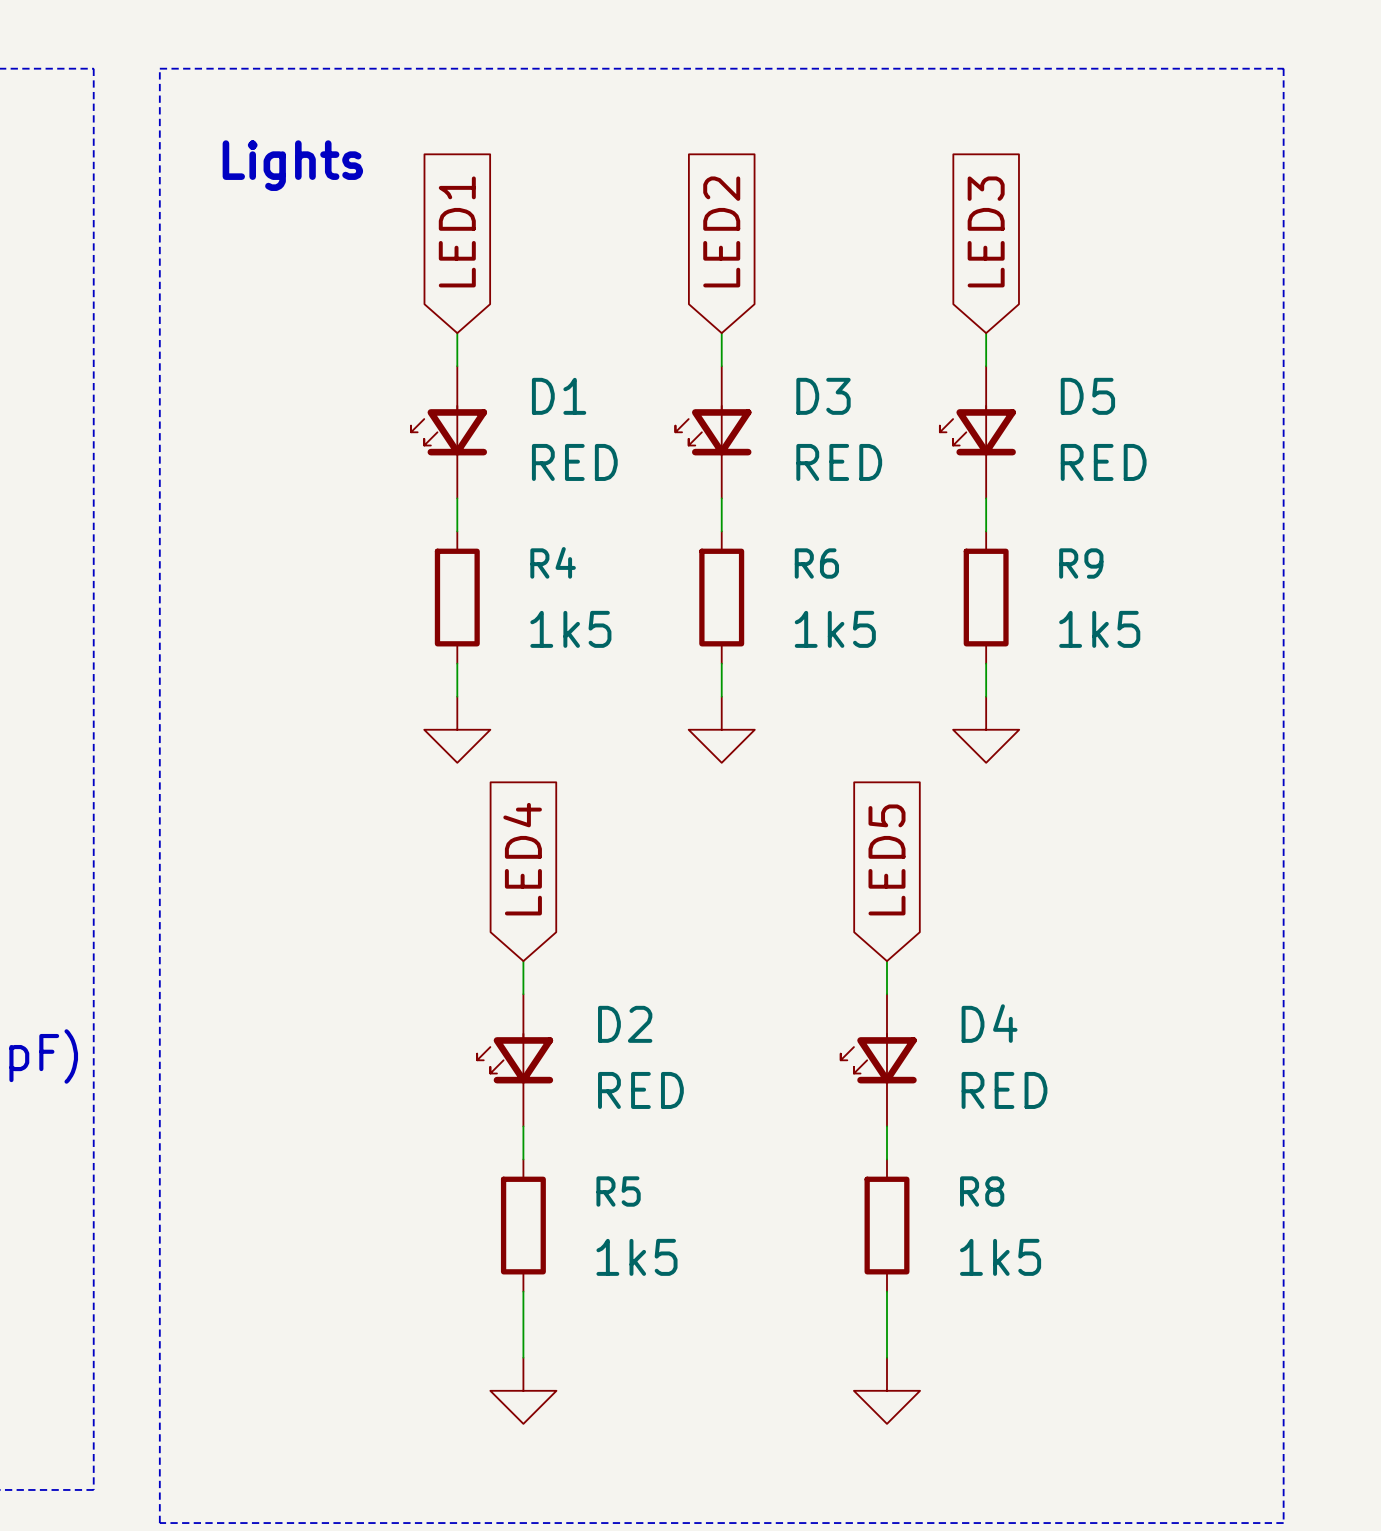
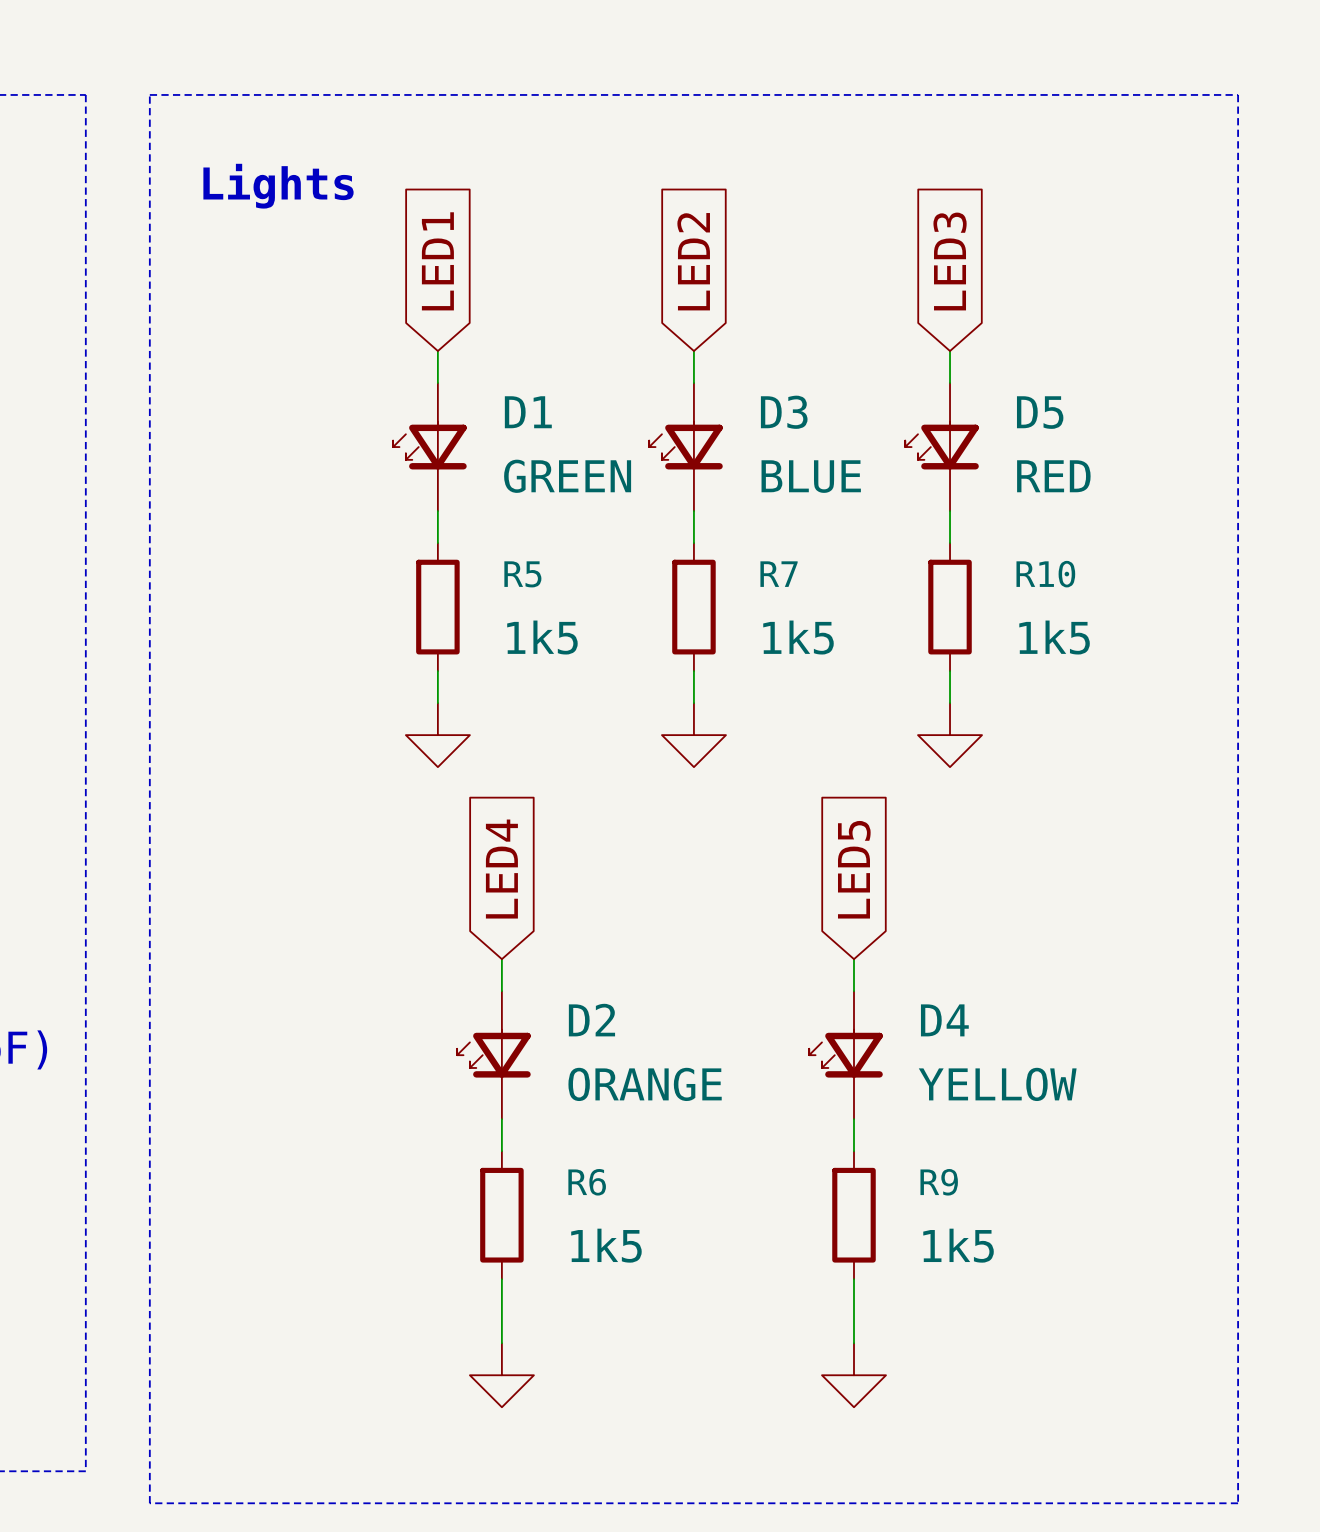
D1 value: RED (574, 462) -> GREEN (567, 476)
D3 value: RED (839, 462) -> BLUE (811, 476)
R4 name: R4 (553, 562) -> R5 (522, 574)
R6 name: R6 (816, 563) -> R7 (779, 574)
R9 name: R9 (1081, 563) -> R10 (1045, 574)
D2 value: RED (640, 1090) -> ORANGE (645, 1084)
D4 value: RED (1004, 1090) -> YELLOW (997, 1084)
R5 name: R5 (618, 1191) -> R6 (587, 1182)
R8 name: R8 (982, 1191) -> R9 (939, 1182)

